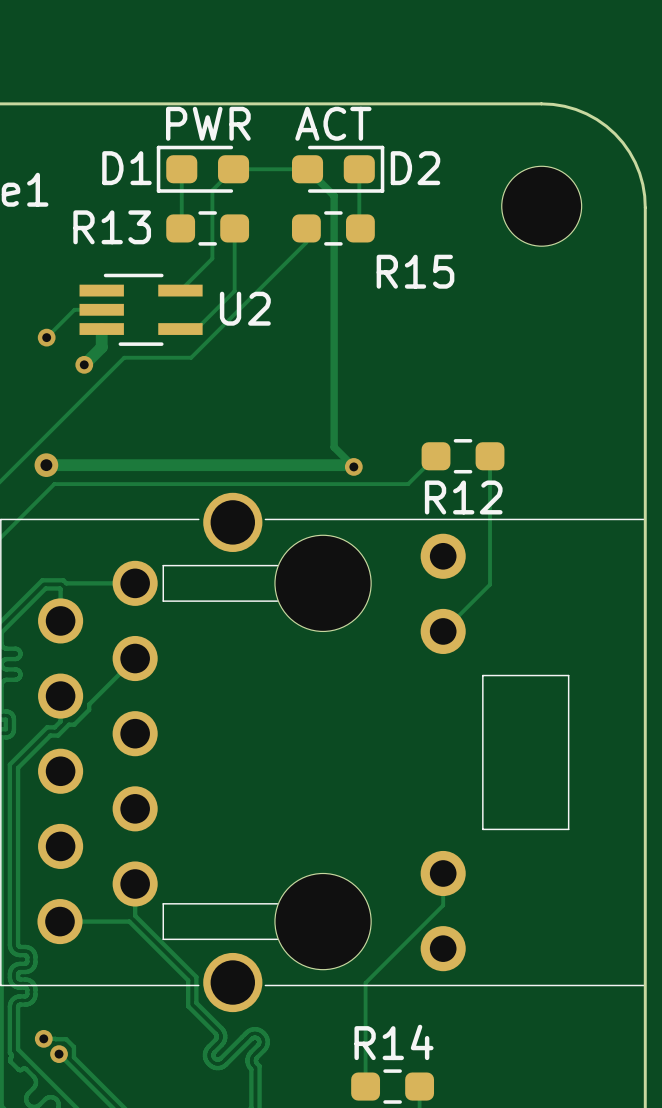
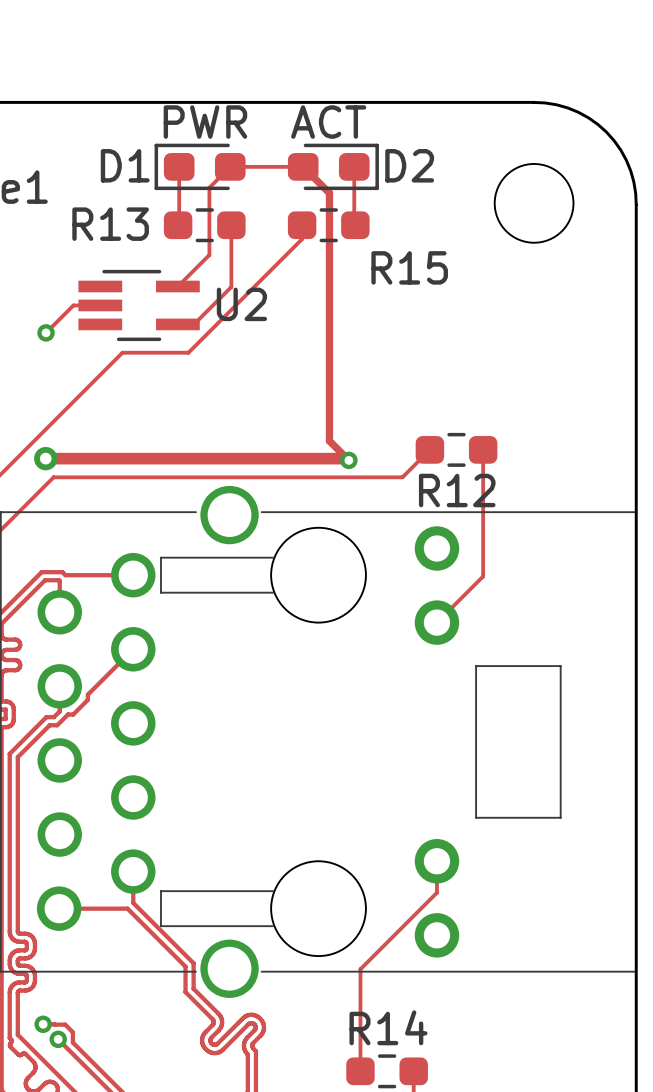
track: (101, 329) (101, 347) (84, 364) -> none
via: (84, 364) -> none

